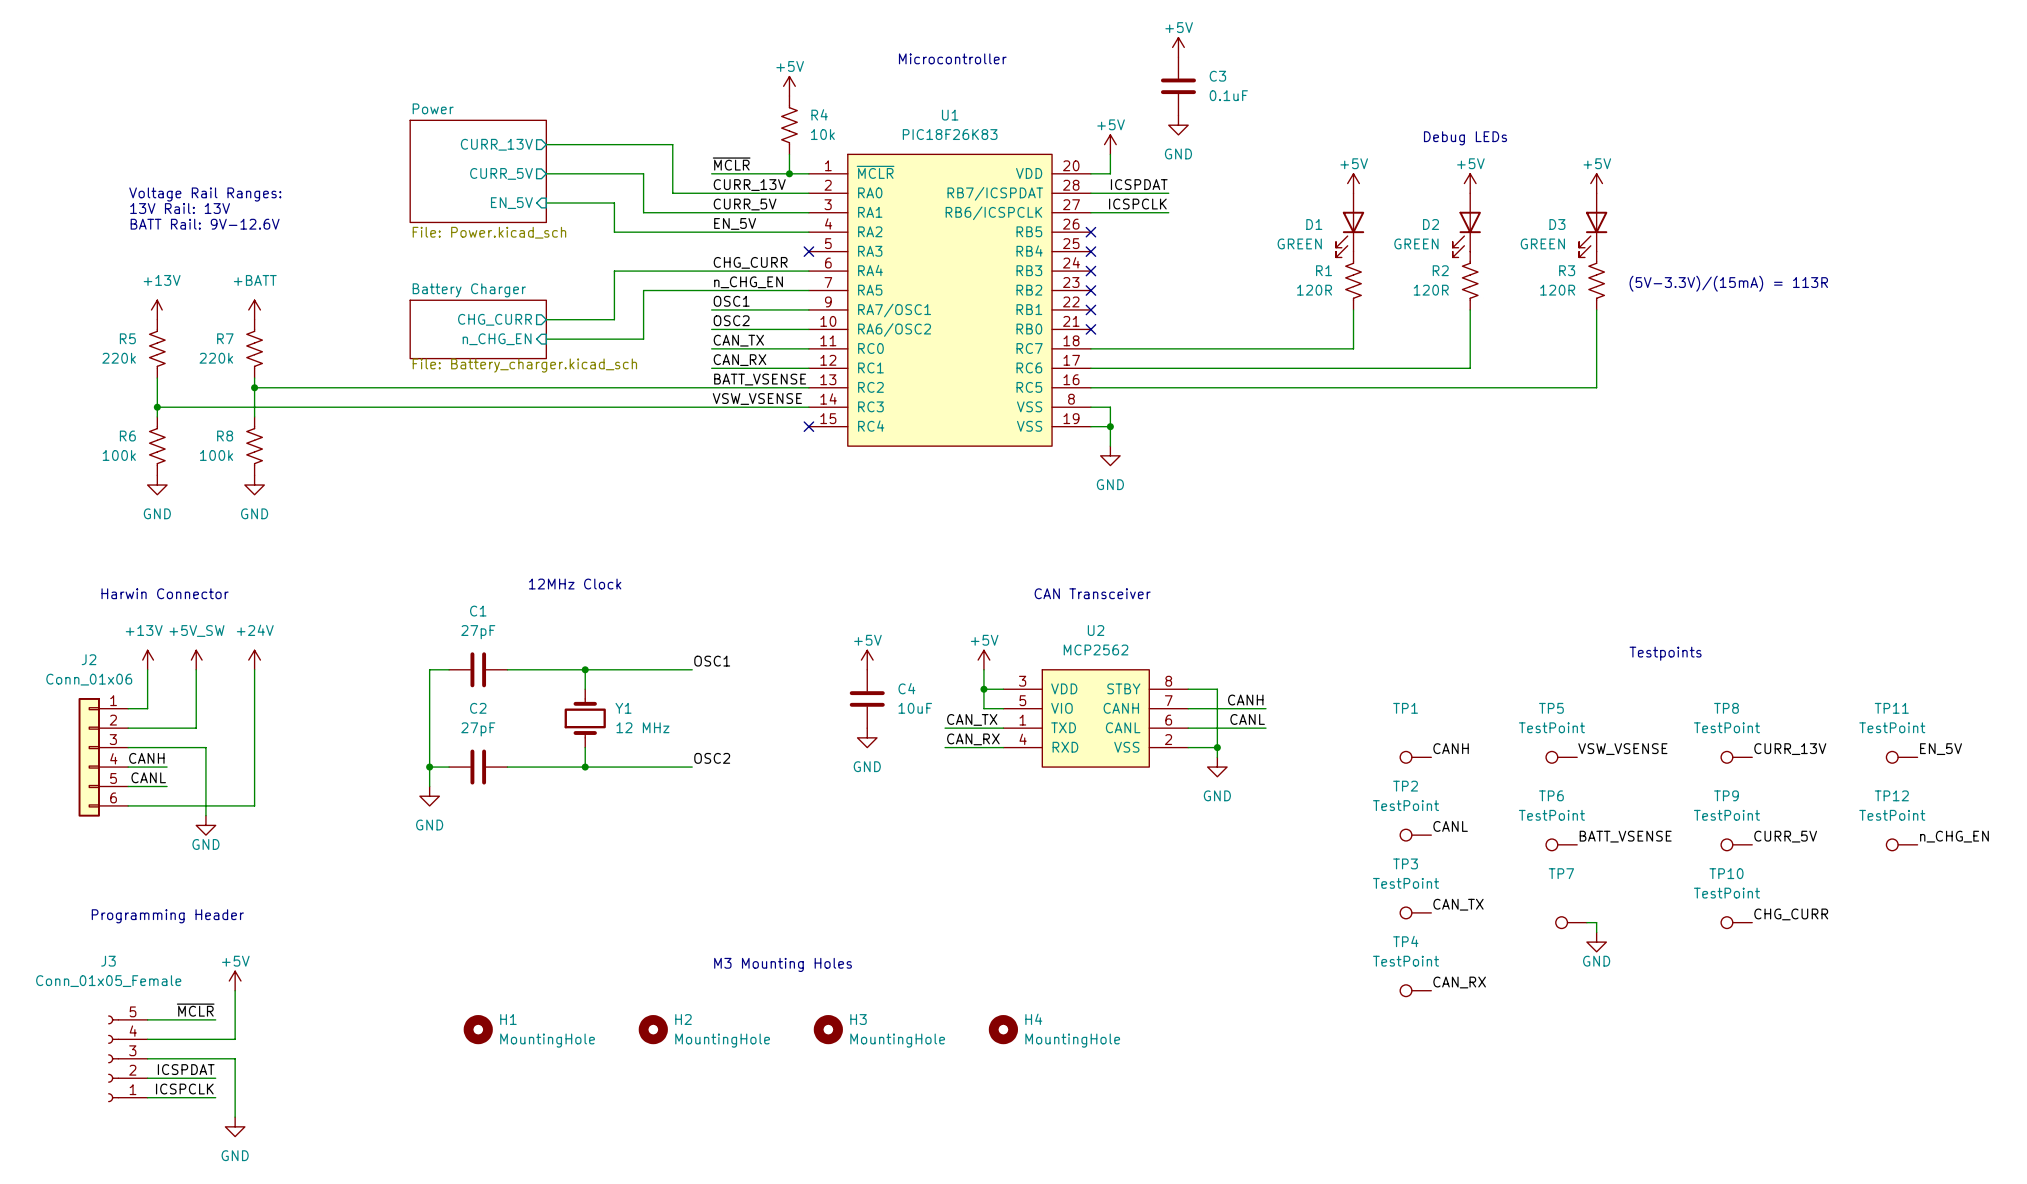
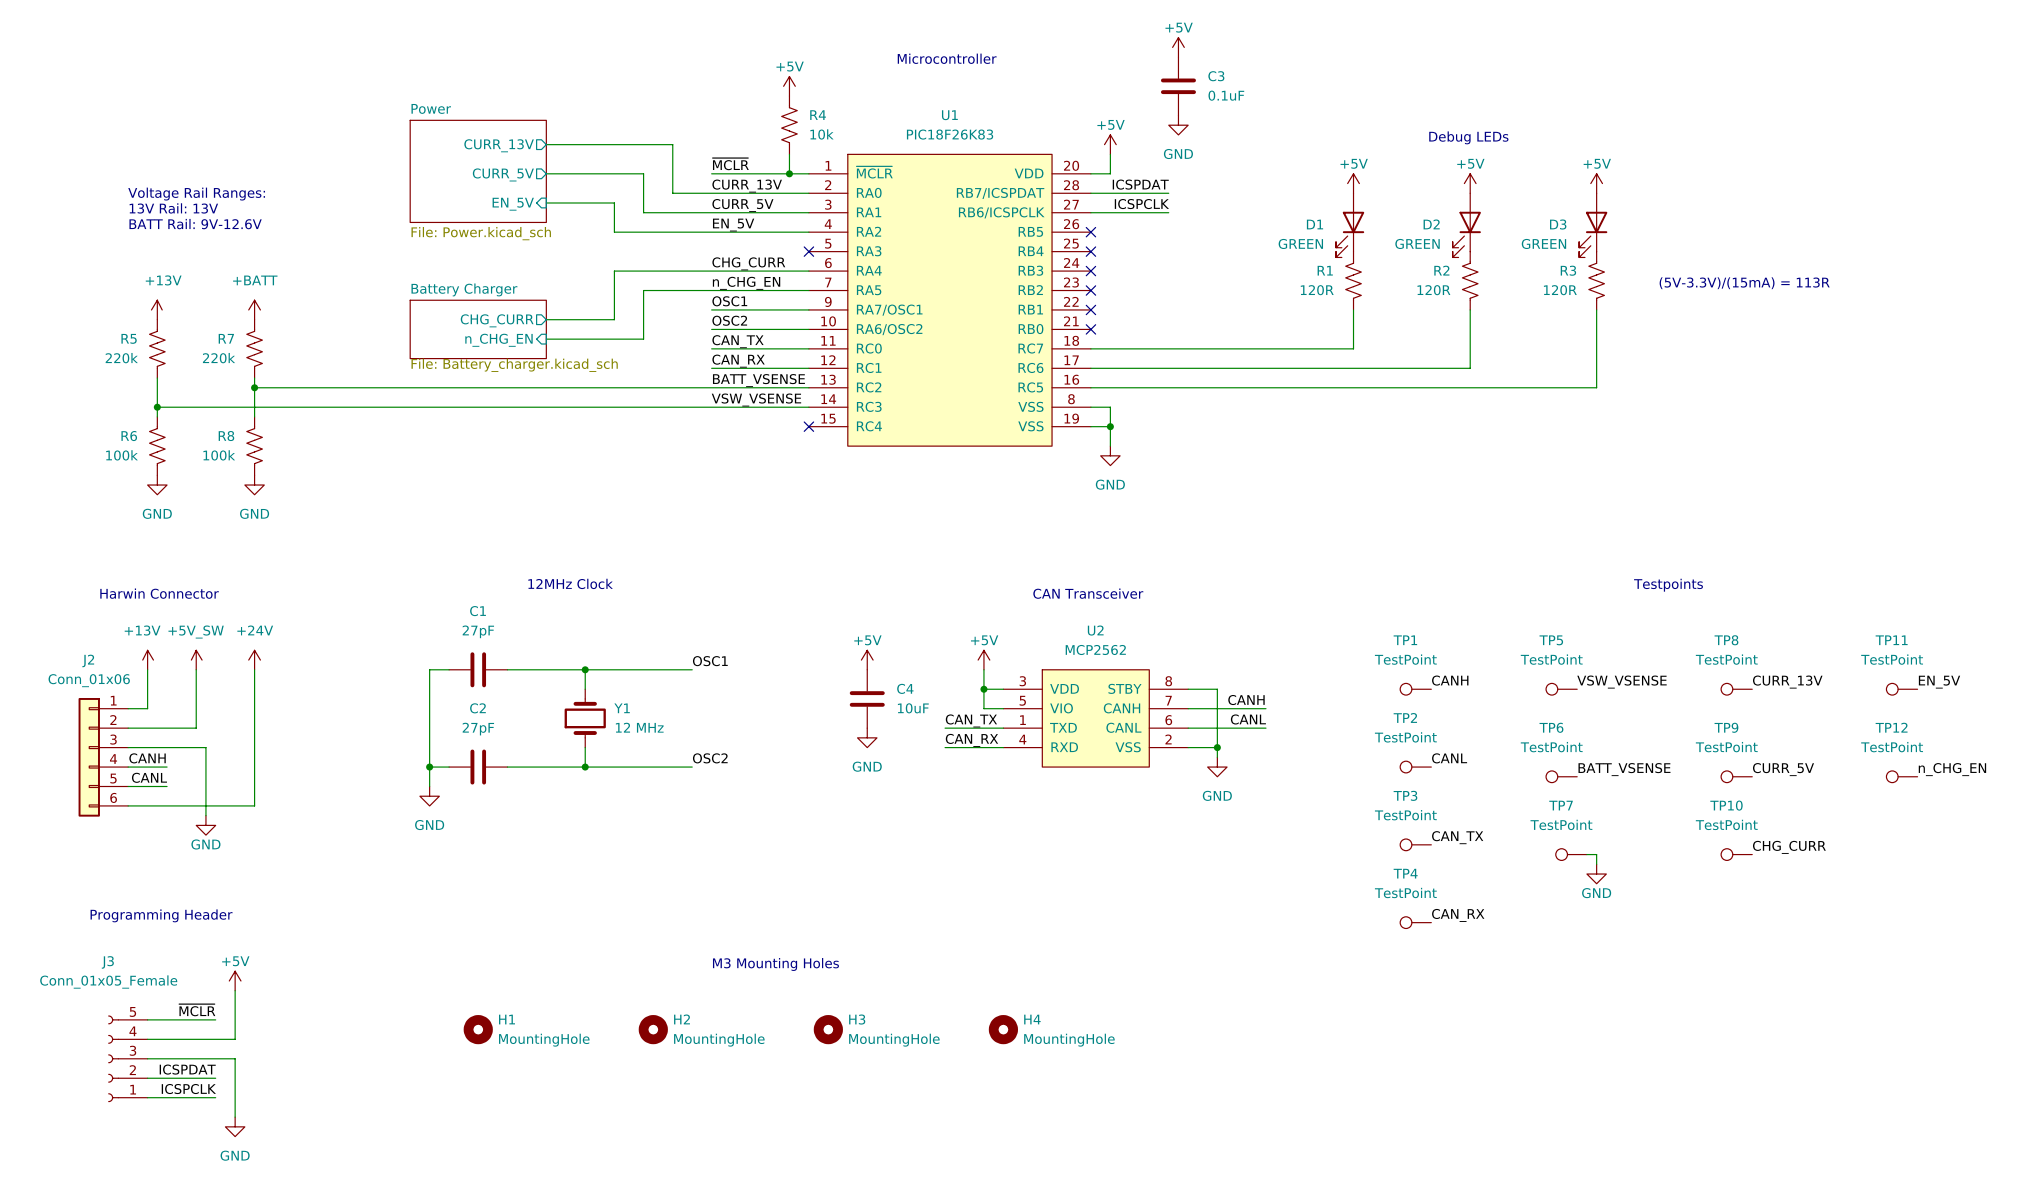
text position: Testpoints (1665, 653) -> Testpoints (1668, 585)
TP1 value: none -> TestPoint (1405, 659)
label position: CANH (1451, 748) -> CANH (1450, 680)
label position: VSW_VSENSE (1622, 749) -> VSW_VSENSE (1621, 682)
label position: CURR_13V (1790, 749) -> CURR_13V (1787, 682)
label position: EN_5V (1941, 749) -> EN_5V (1939, 682)
TP1 position: (1415, 757) -> (1415, 689)
TP5 position: (1561, 757) -> (1561, 689)
TP8 position: (1736, 757) -> (1736, 689)
TP11 position: (1902, 757) -> (1902, 689)
TP7 value: none -> TestPoint (1561, 824)
label position: CANL (1450, 826) -> CANL (1449, 758)
TP2 position: (1415, 835) -> (1415, 767)
label position: BATT_VSENSE (1625, 836) -> BATT_VSENSE (1624, 769)
label position: CURR_5V (1785, 836) -> CURR_5V (1783, 769)
label position: n_CHG_EN (1954, 836) -> n_CHG_EN (1952, 769)
TP6 position: (1561, 844) -> (1561, 776)
TP9 position: (1736, 844) -> (1736, 776)
TP12 position: (1902, 844) -> (1902, 776)
label position: CAN_TX (1458, 904) -> CAN_TX (1457, 837)
TP3 position: (1415, 912) -> (1415, 844)
label position: CHG_CURR (1791, 914) -> CHG_CURR (1789, 847)
TP7 position: (1571, 922) -> (1571, 854)
wire: (1586, 922) (1596, 922) (1596, 932) -> (1586, 854) (1596, 854) (1596, 864)
TP10 position: (1736, 922) -> (1736, 854)
power symbol position: GND (1596, 942) -> GND (1596, 874)
label position: CAN_RX (1459, 982) -> CAN_RX (1458, 915)
TP4 position: (1415, 990) -> (1415, 922)

